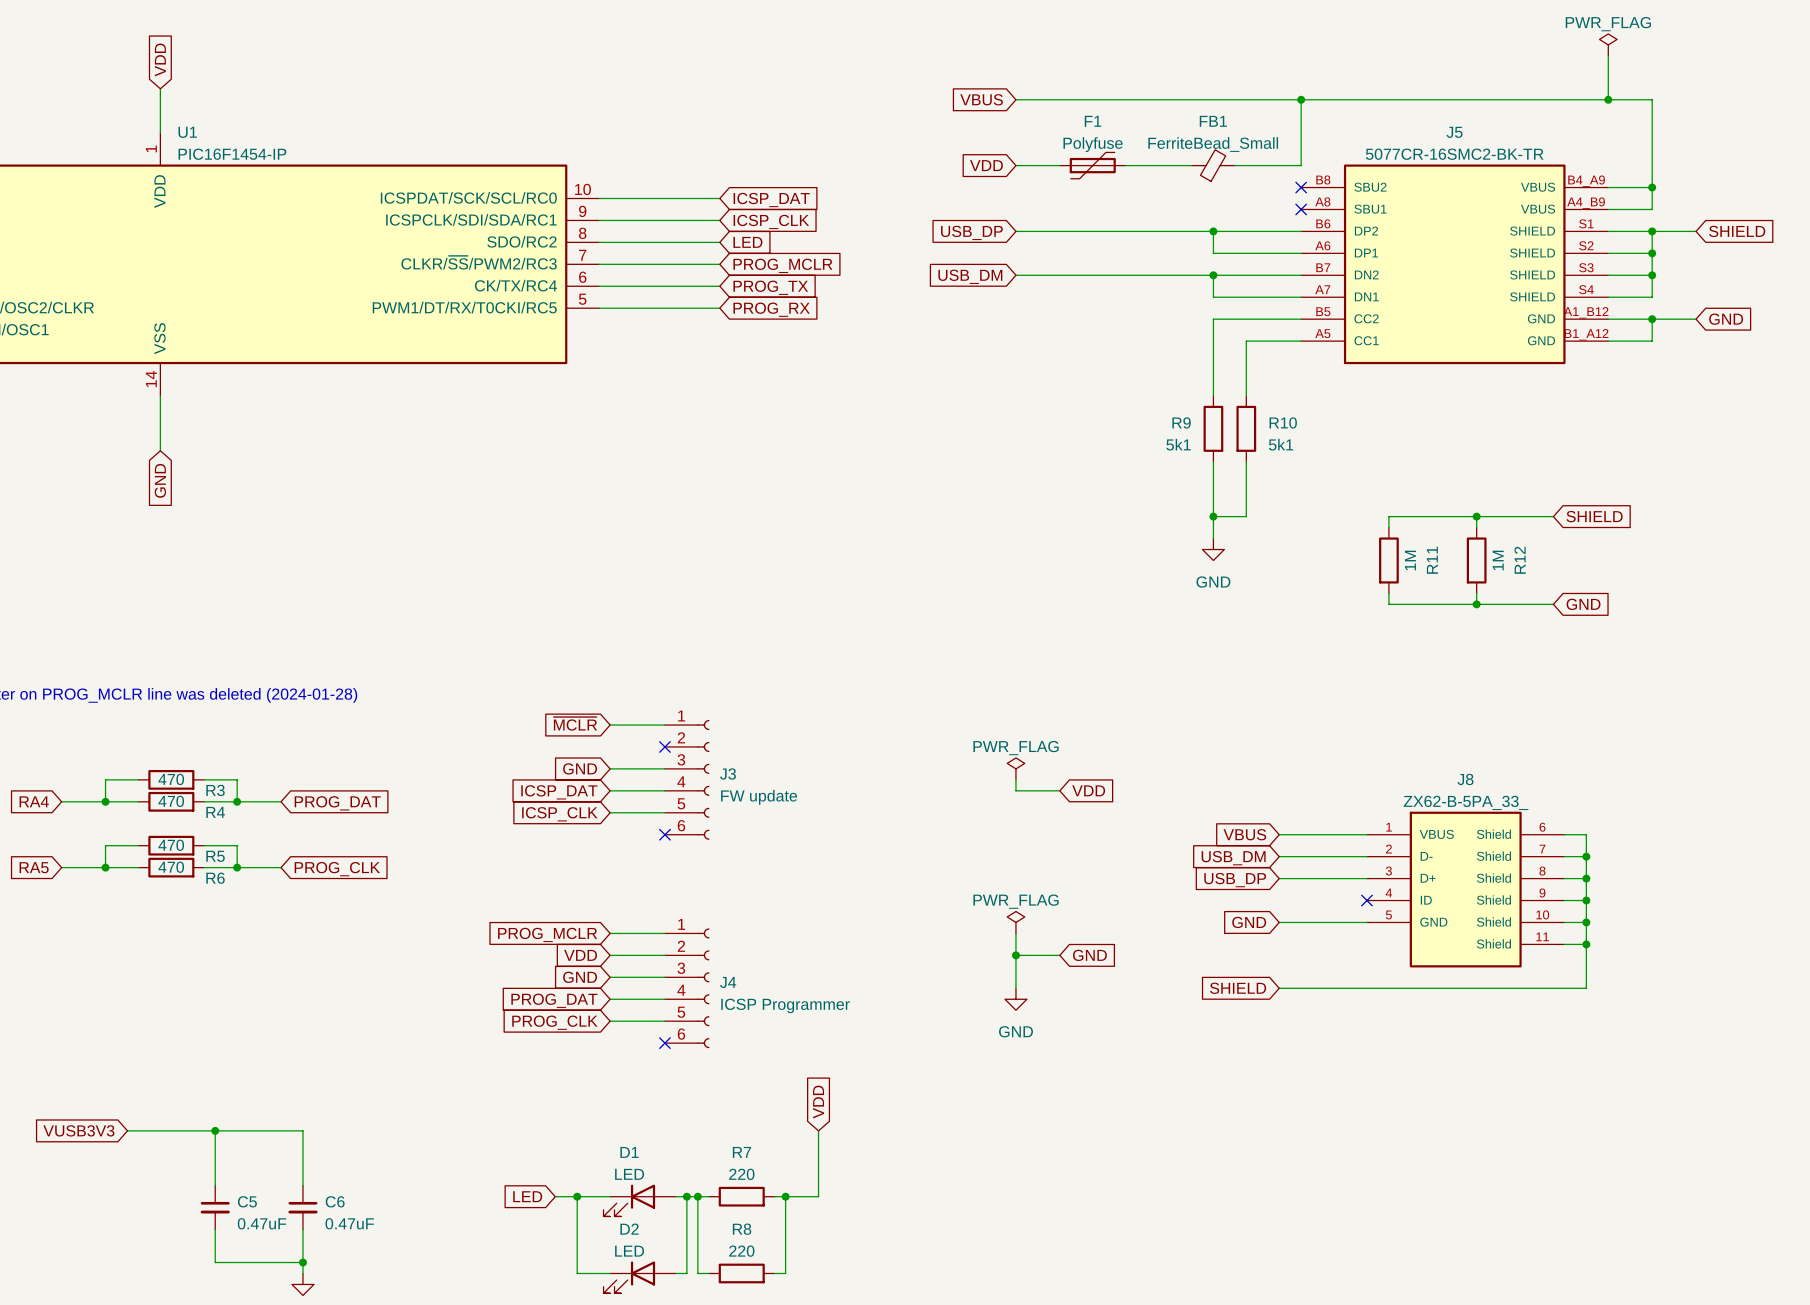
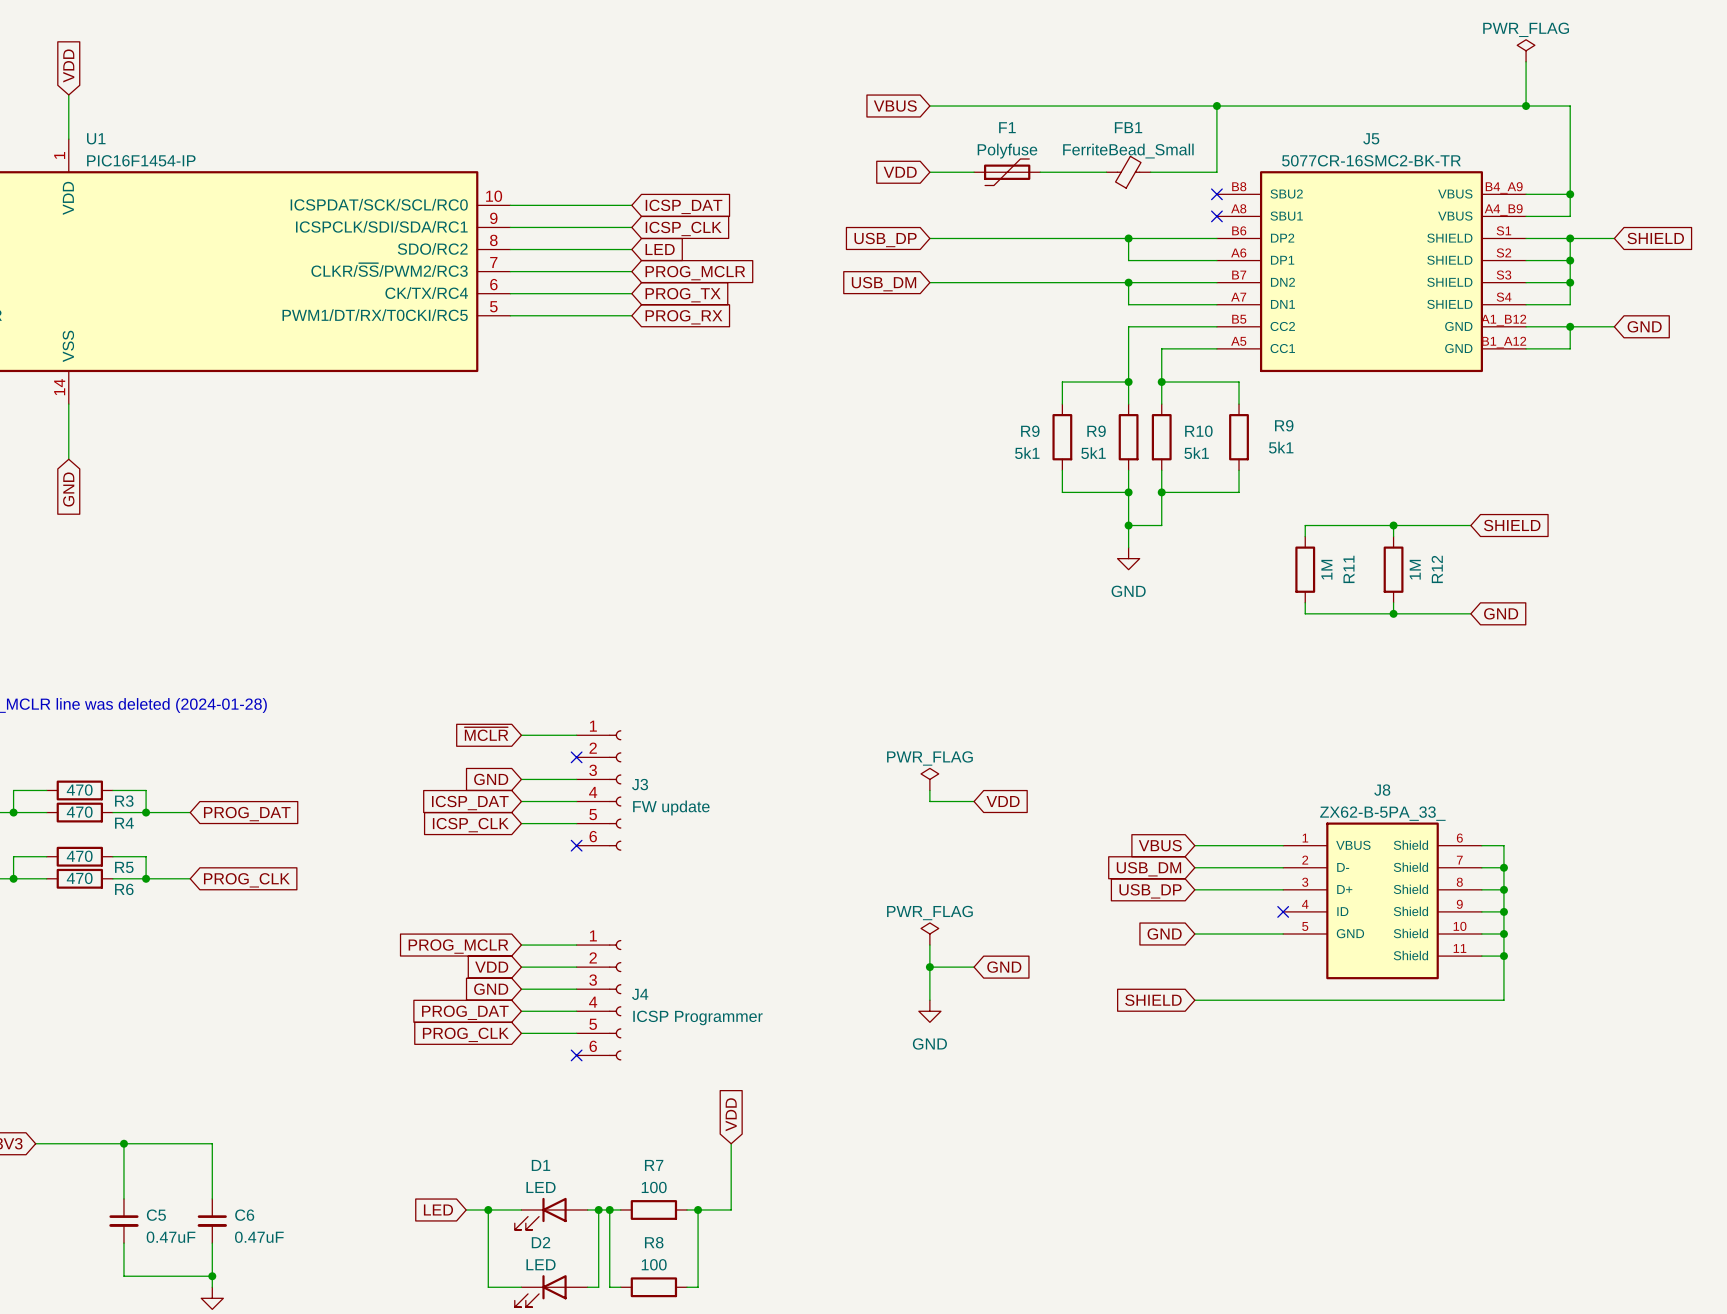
wire: none -> (1128, 382) (1062, 382) (1062, 404)
junction: none -> (1128, 382)
wire: none -> (1161, 382) (1239, 382) (1239, 404)
junction: none -> (1161, 382)
R9: none -> 5k1 (1062, 437)
R9: none -> 5k1 (1239, 437)
wire: none -> (1062, 470) (1062, 492) (1128, 492)
wire: none -> (1239, 470) (1239, 492) (1161, 492)
junction: none -> (1128, 492)
junction: none -> (1161, 492)
R7 value: 220 (741, 1174) -> 100 (654, 1187)
R8 value: 220 (741, 1251) -> 100 (654, 1264)

